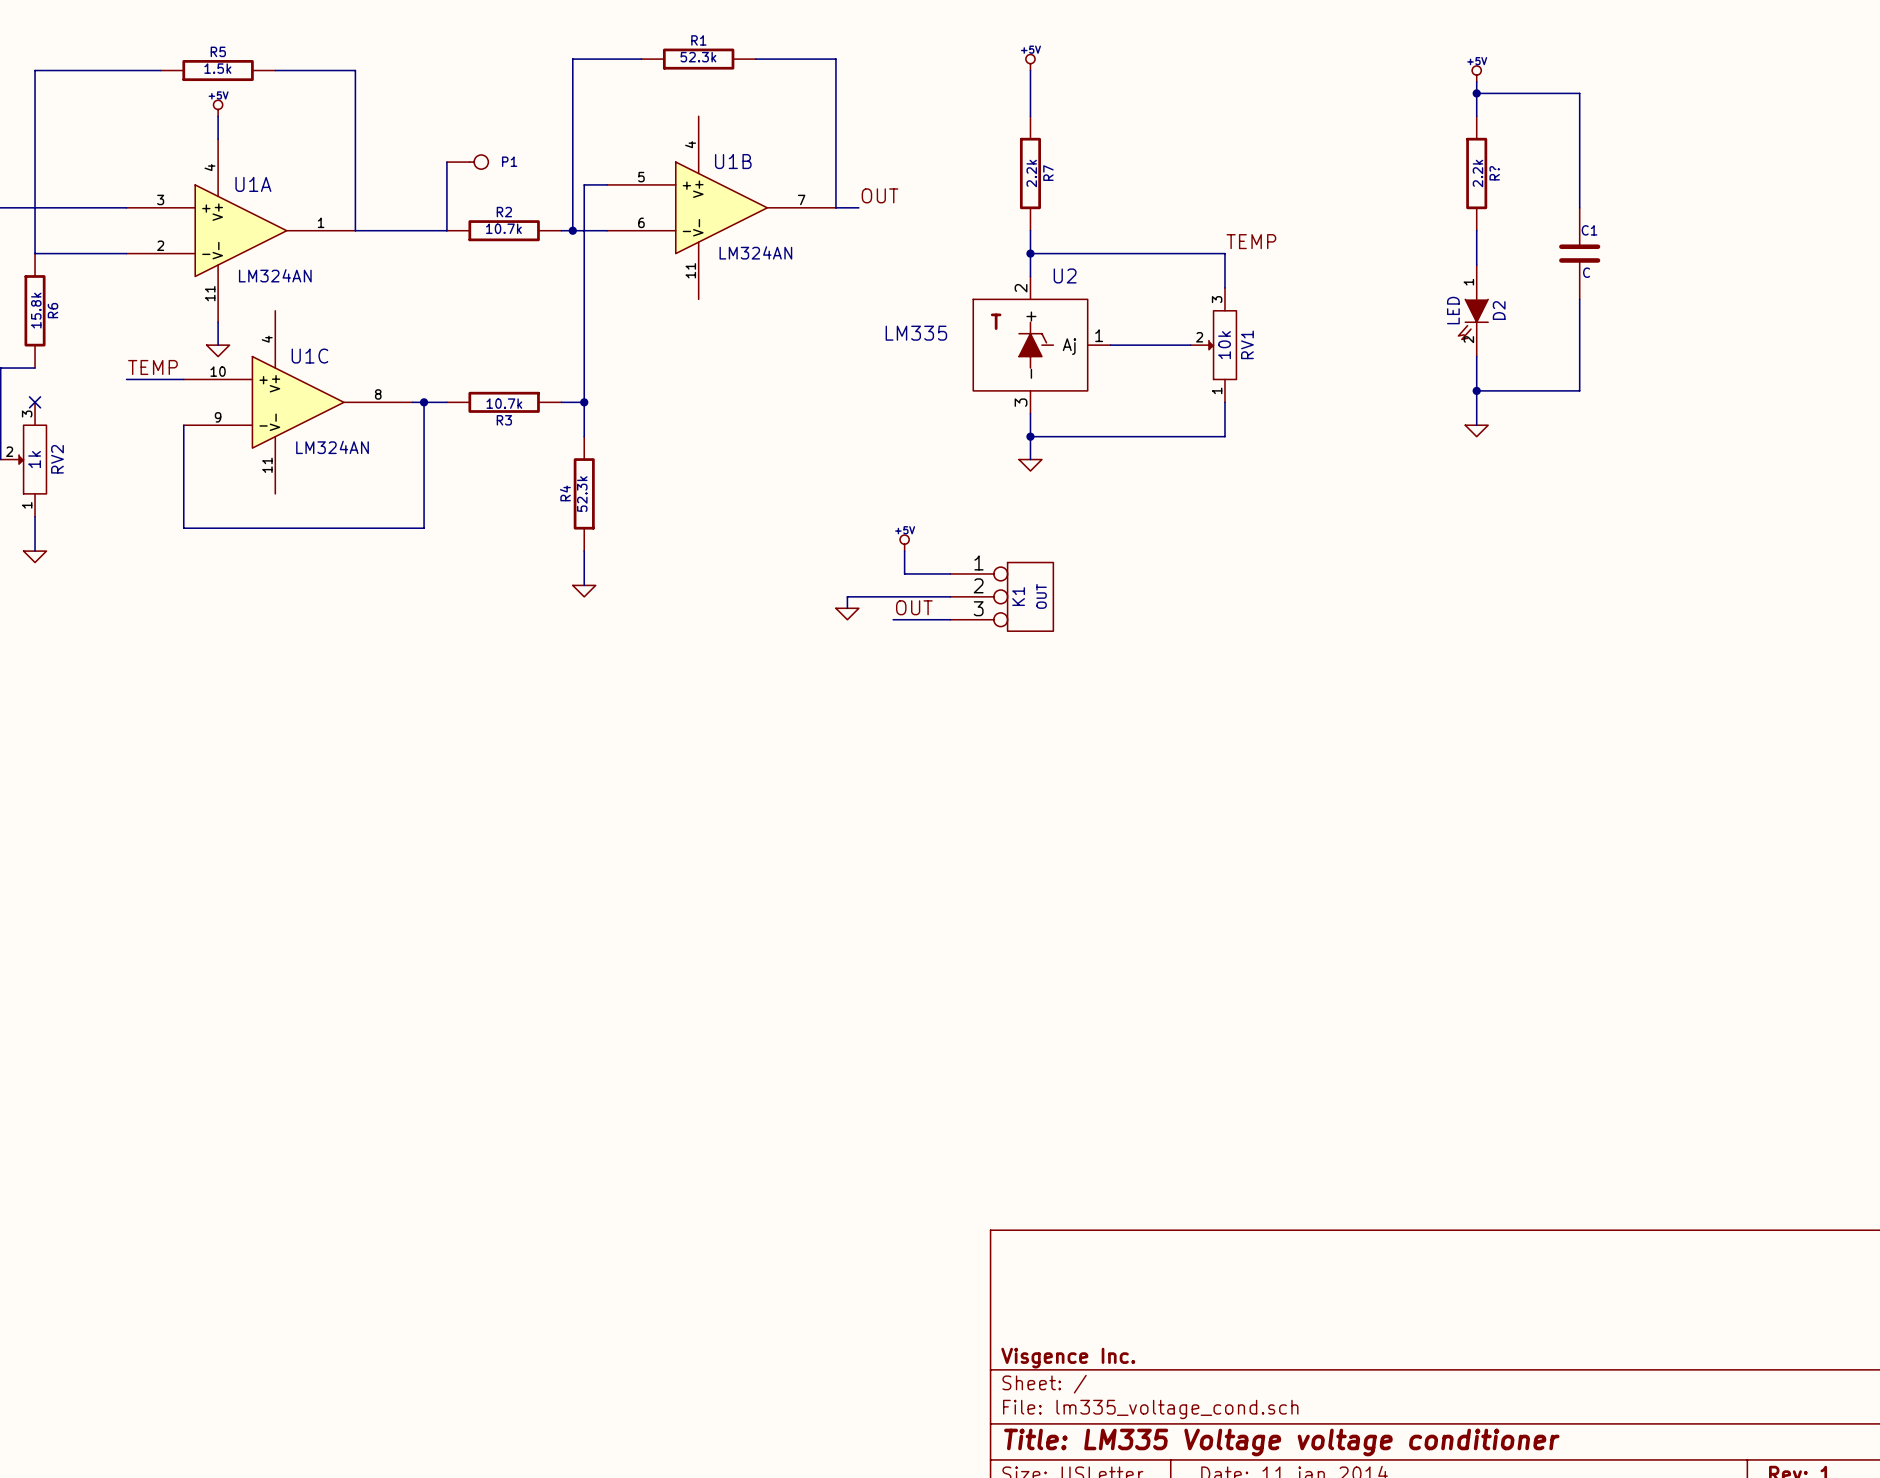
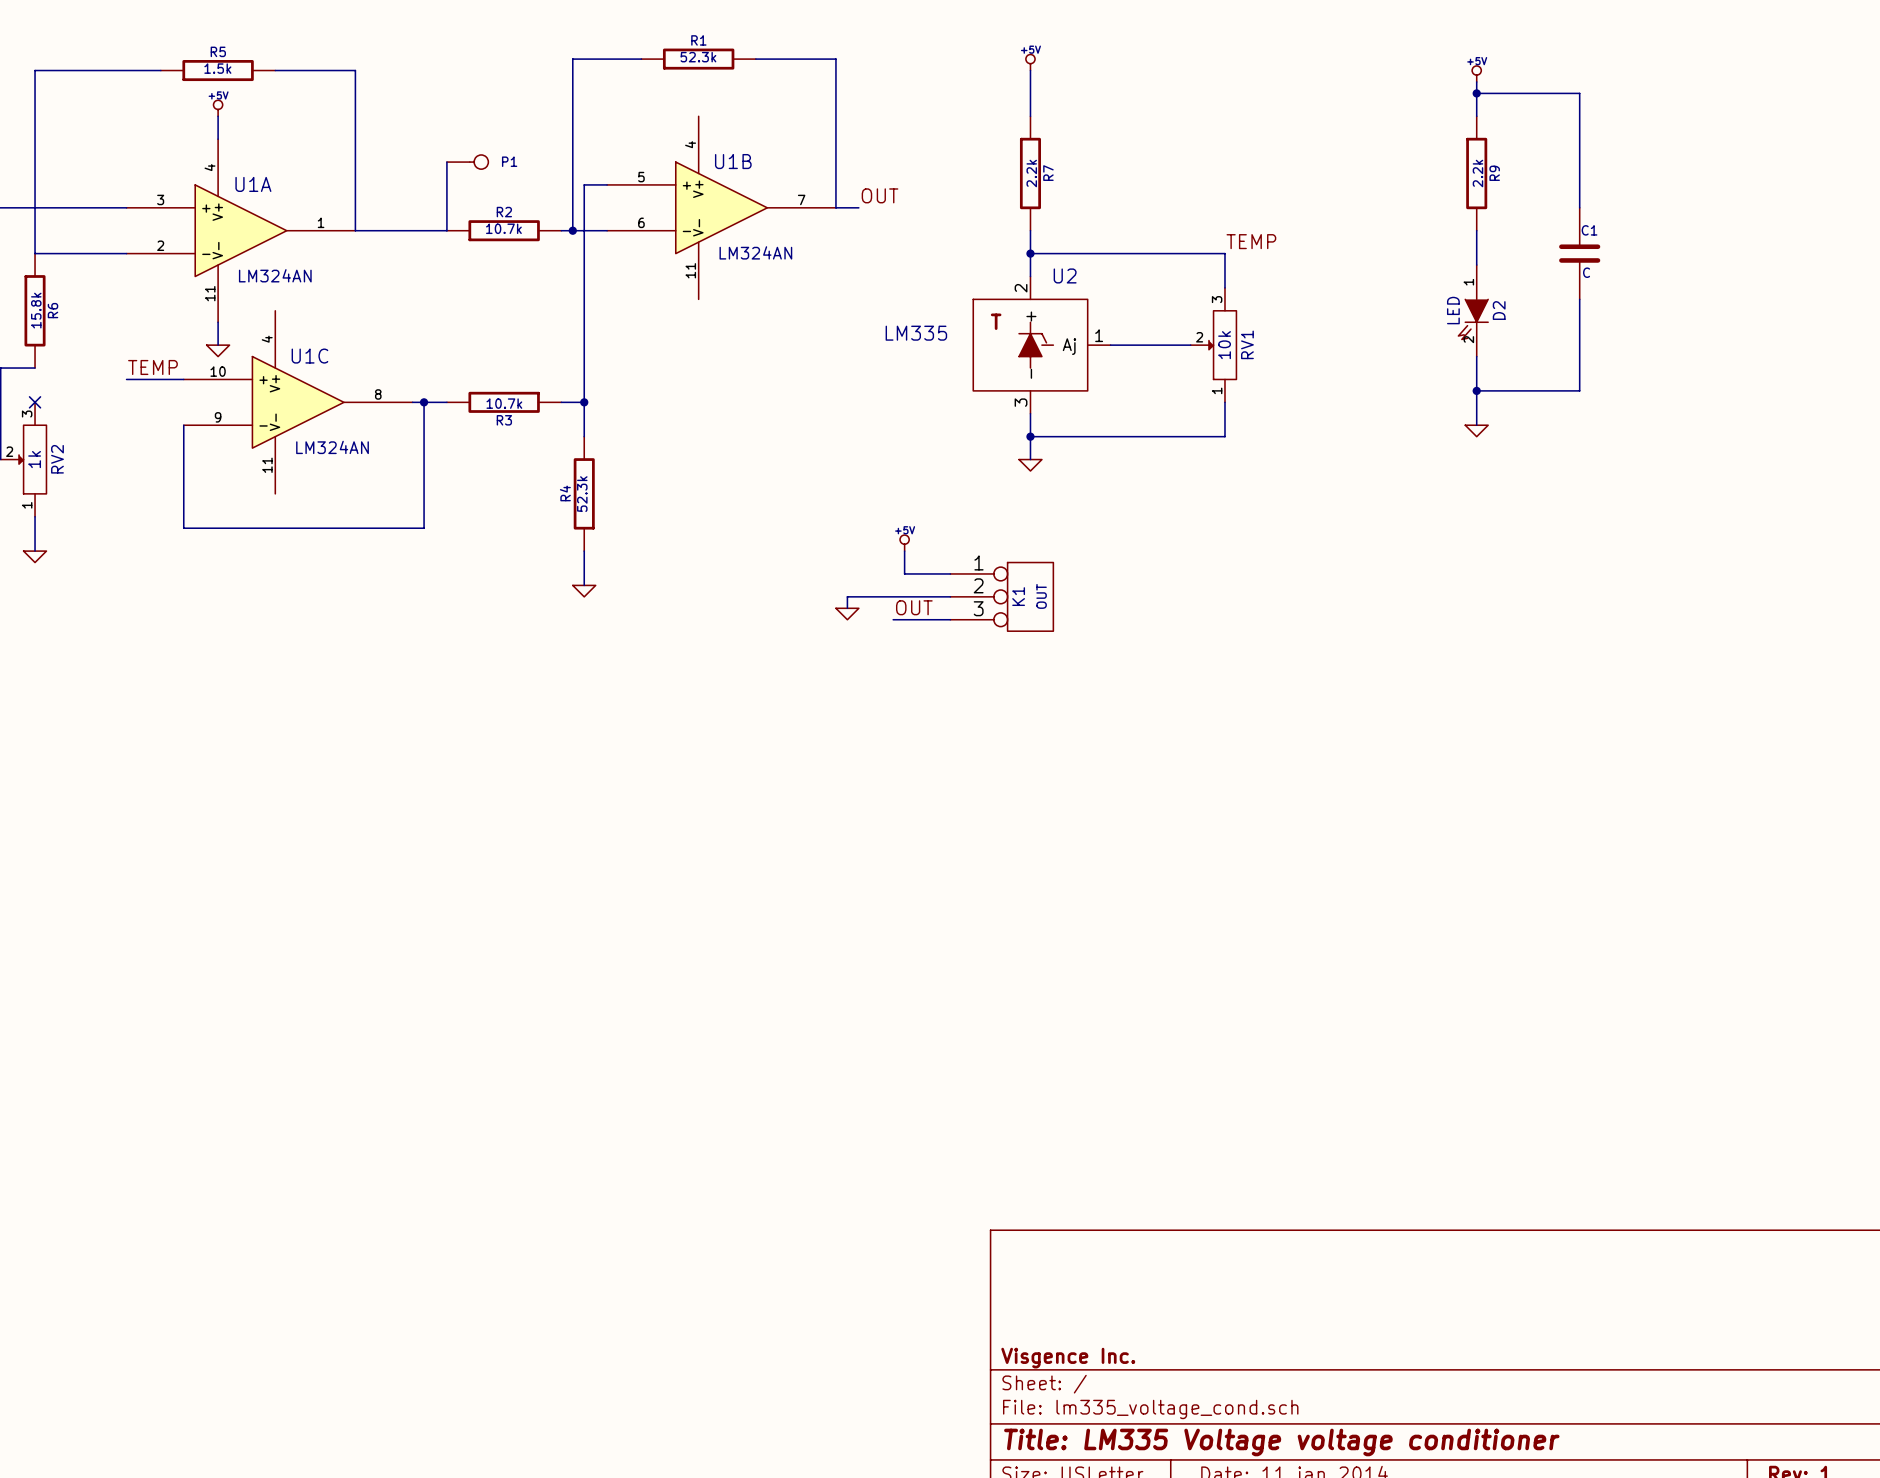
R? name: R? (1494, 173) -> R9 (1494, 173)

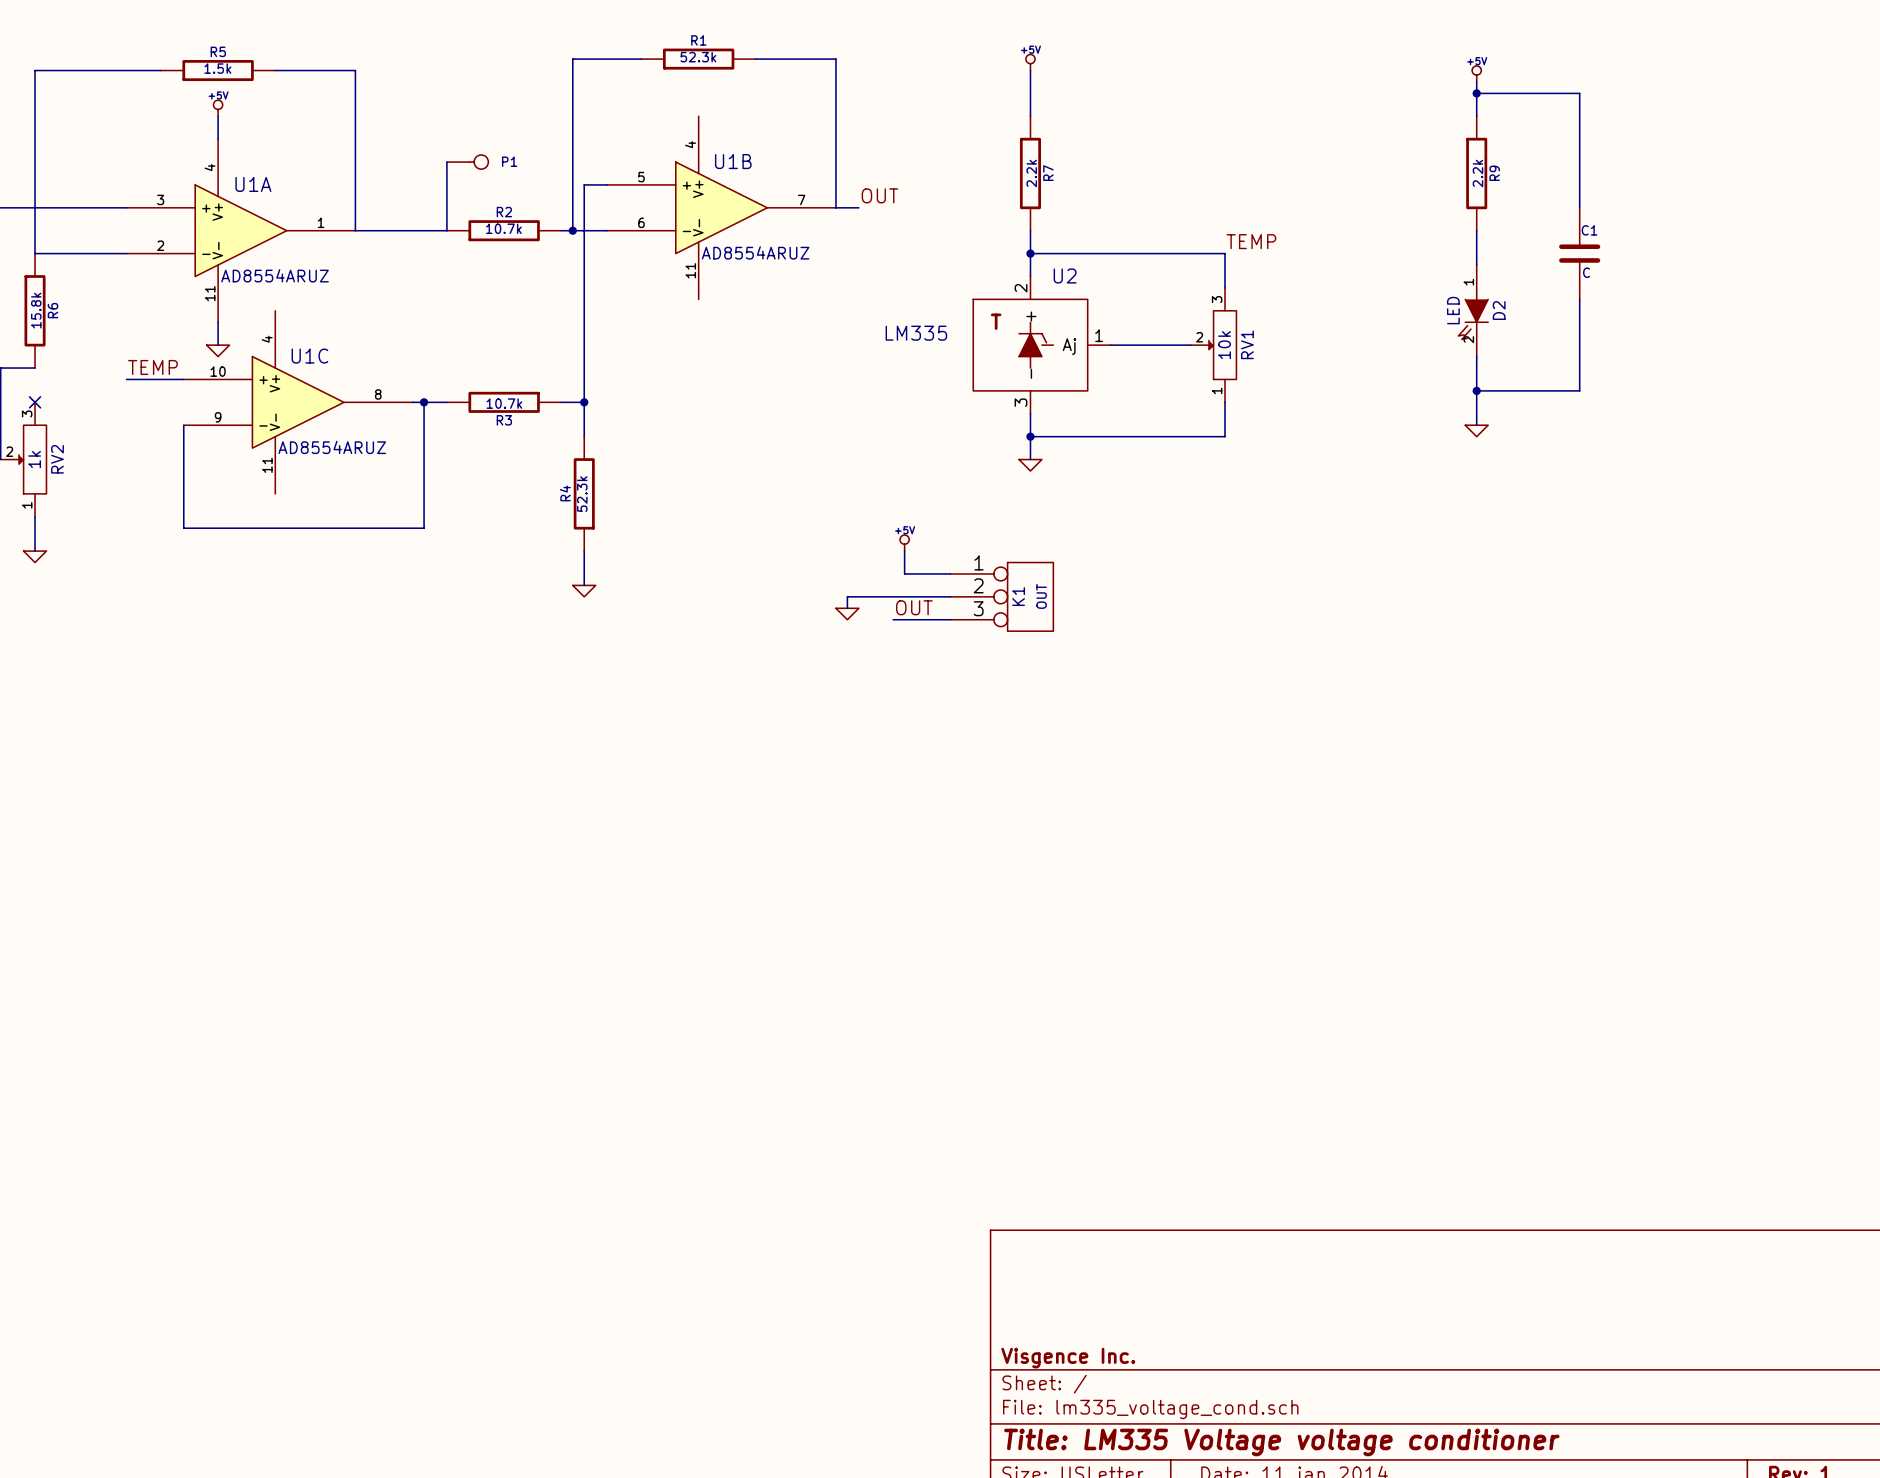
U1B value: LM324AN (755, 252) -> AD8554ARUZ (755, 252)
U1A value: LM324AN (275, 275) -> AD8554ARUZ (275, 275)
U1C value: LM324AN (332, 447) -> AD8554ARUZ (332, 447)

